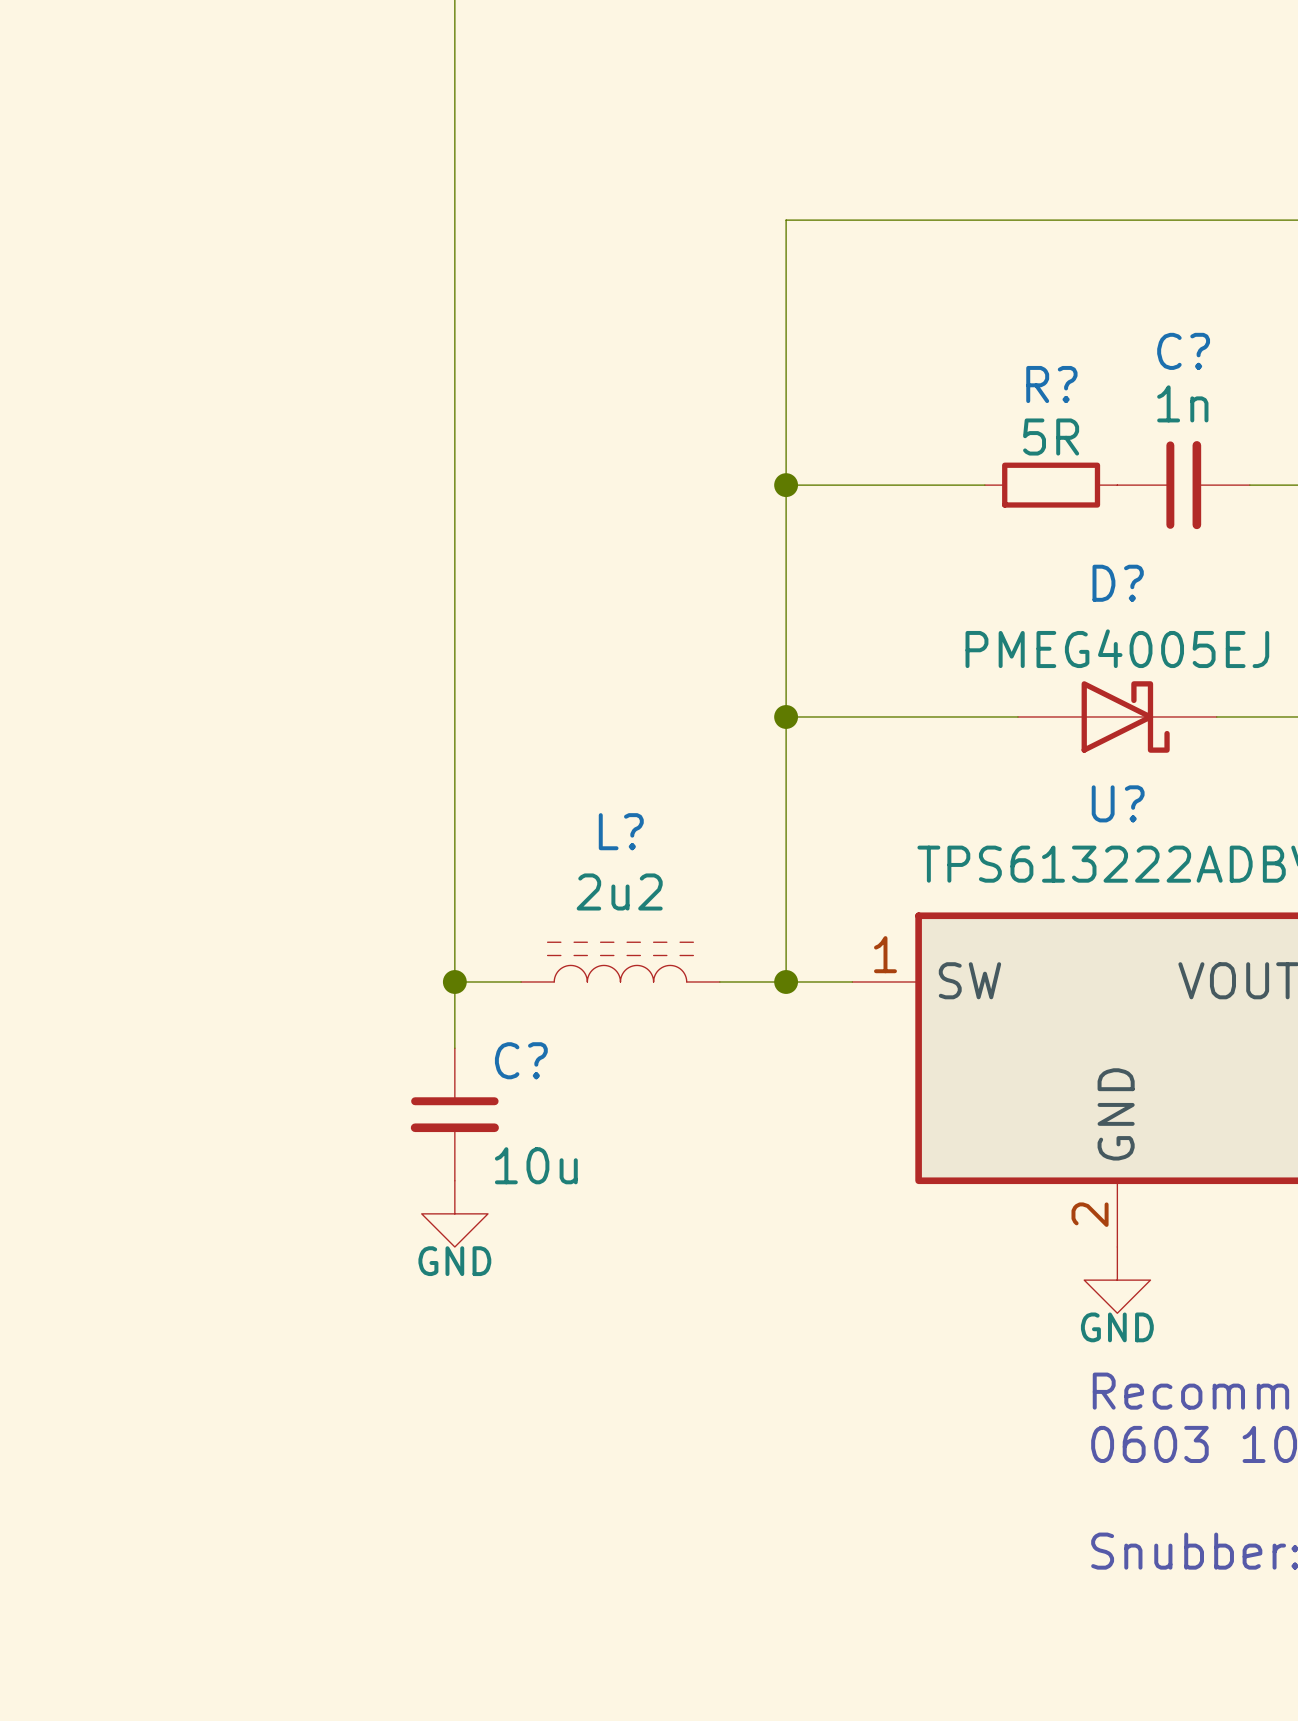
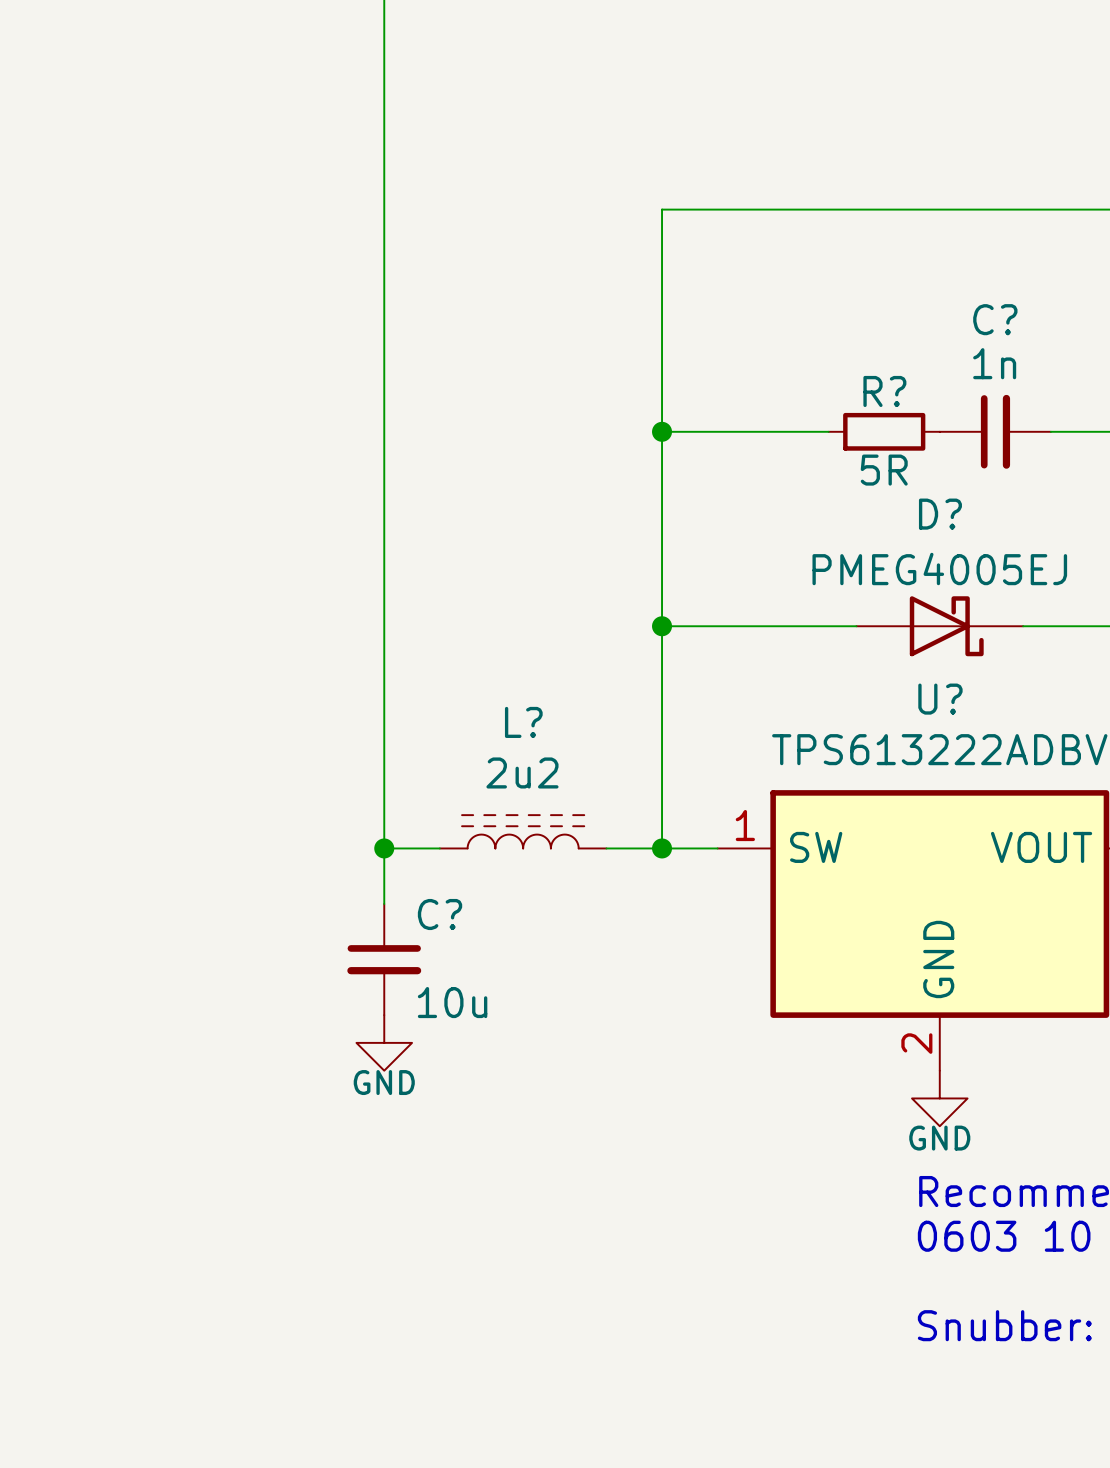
R? name position: R? (1051, 384) -> R? (884, 391)
R? value position: 5R (1051, 437) -> 5R (884, 470)

